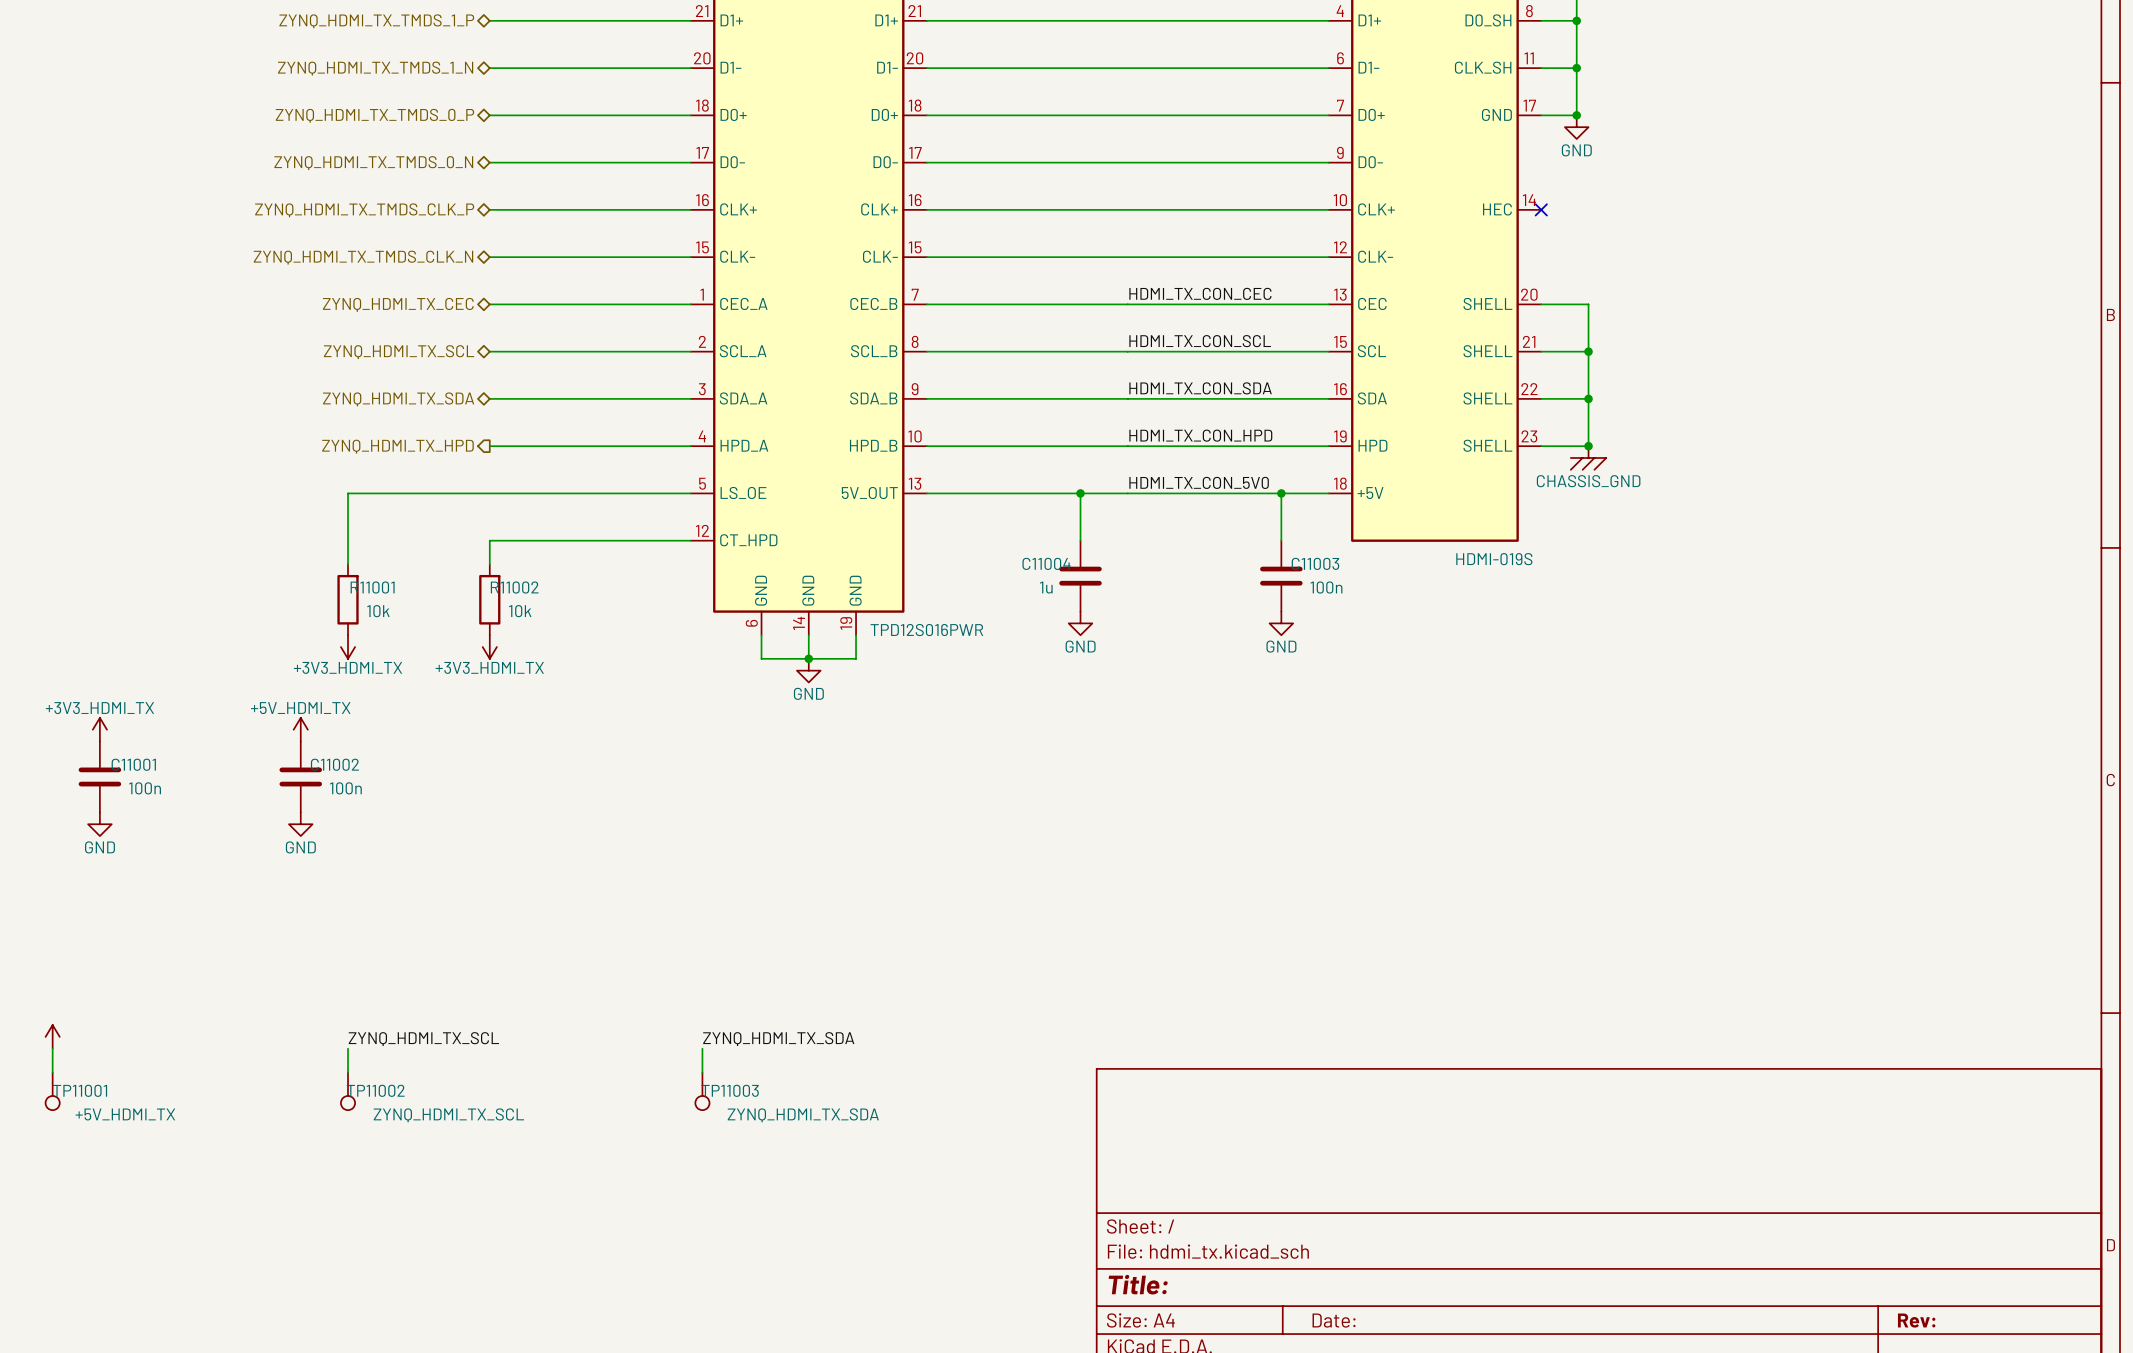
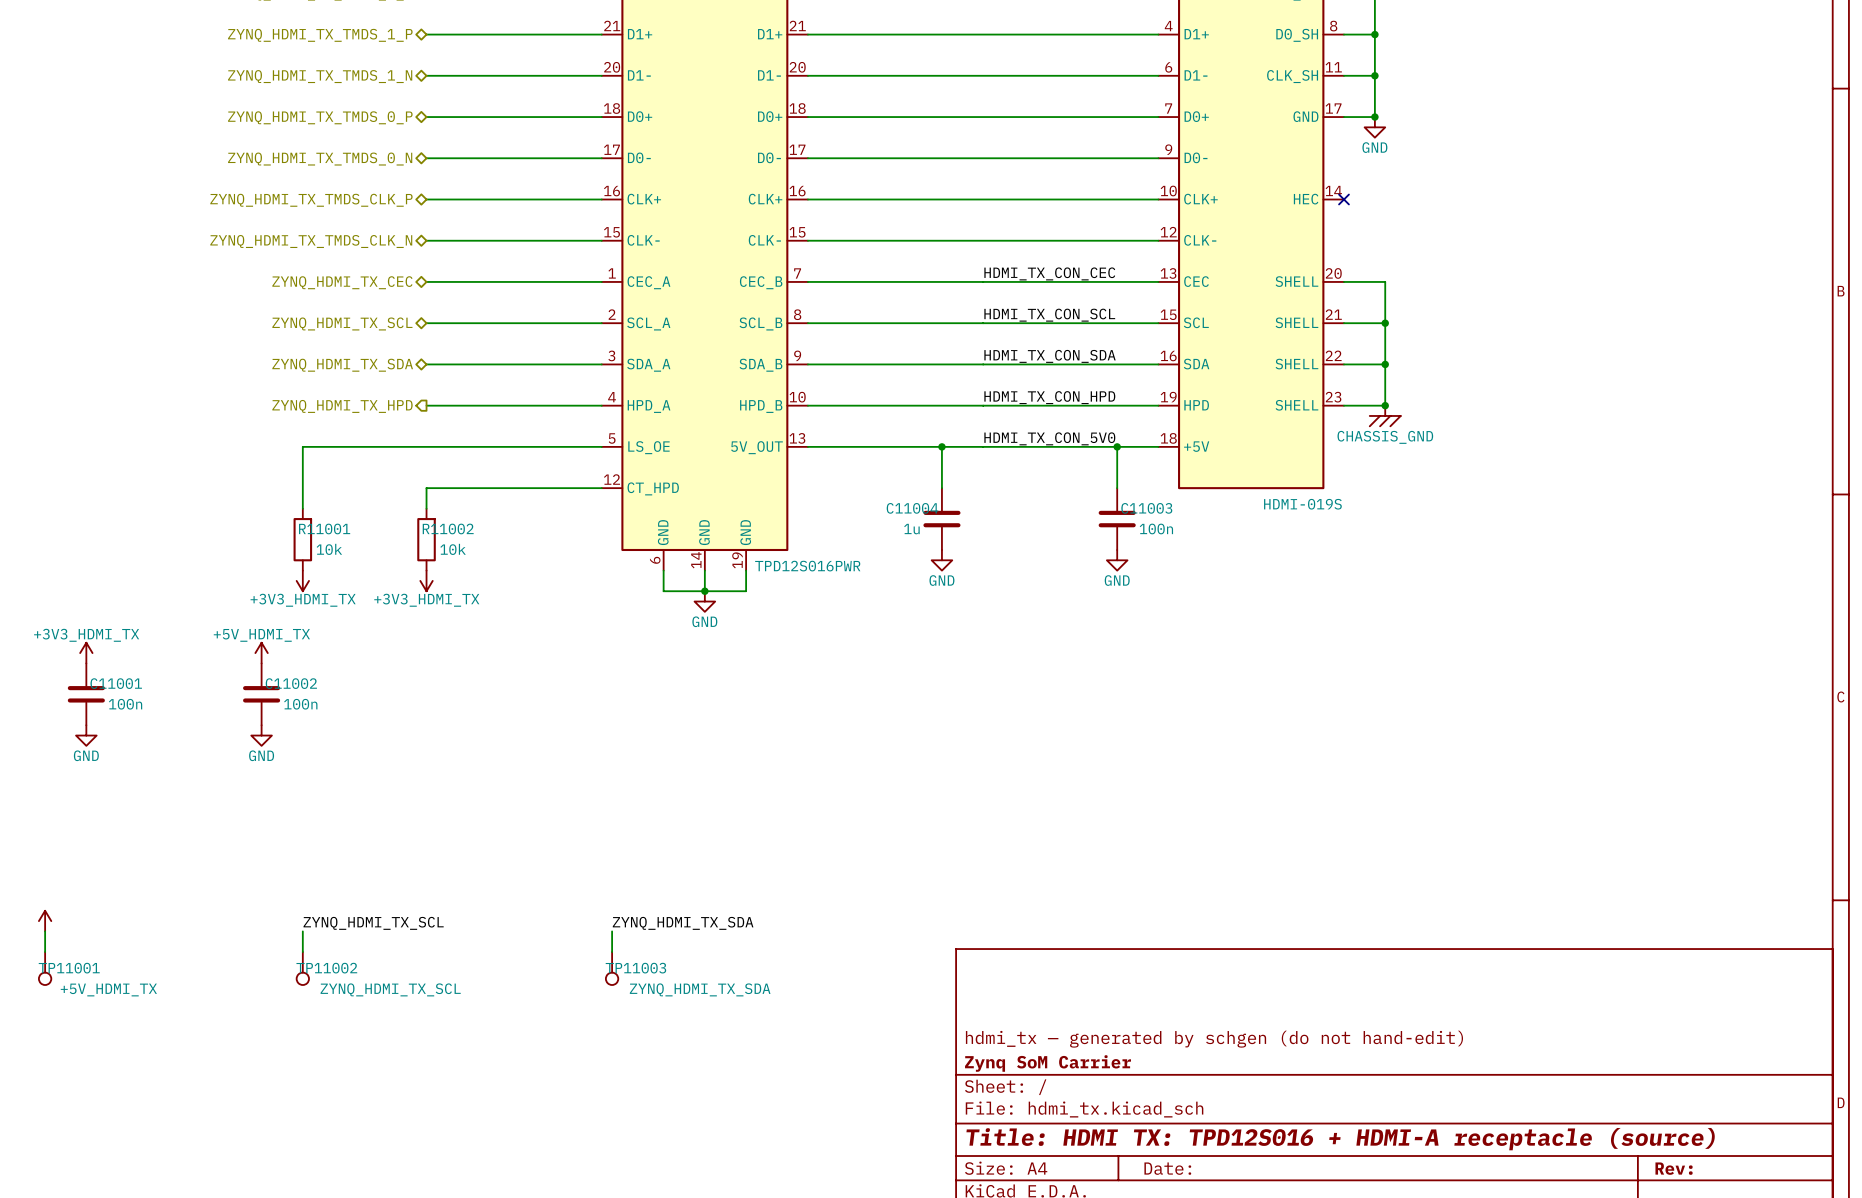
title block: none -> hdmi_tx — generated by schgen (do not hand-edit) (1214, 1039)
title block: none -> Zynq SoM Carrier (1048, 1063)
title block: Title: (1138, 1284) -> Title: HDMI TX: TPD12S016 + HDMI-A receptacle (source) (1340, 1139)

